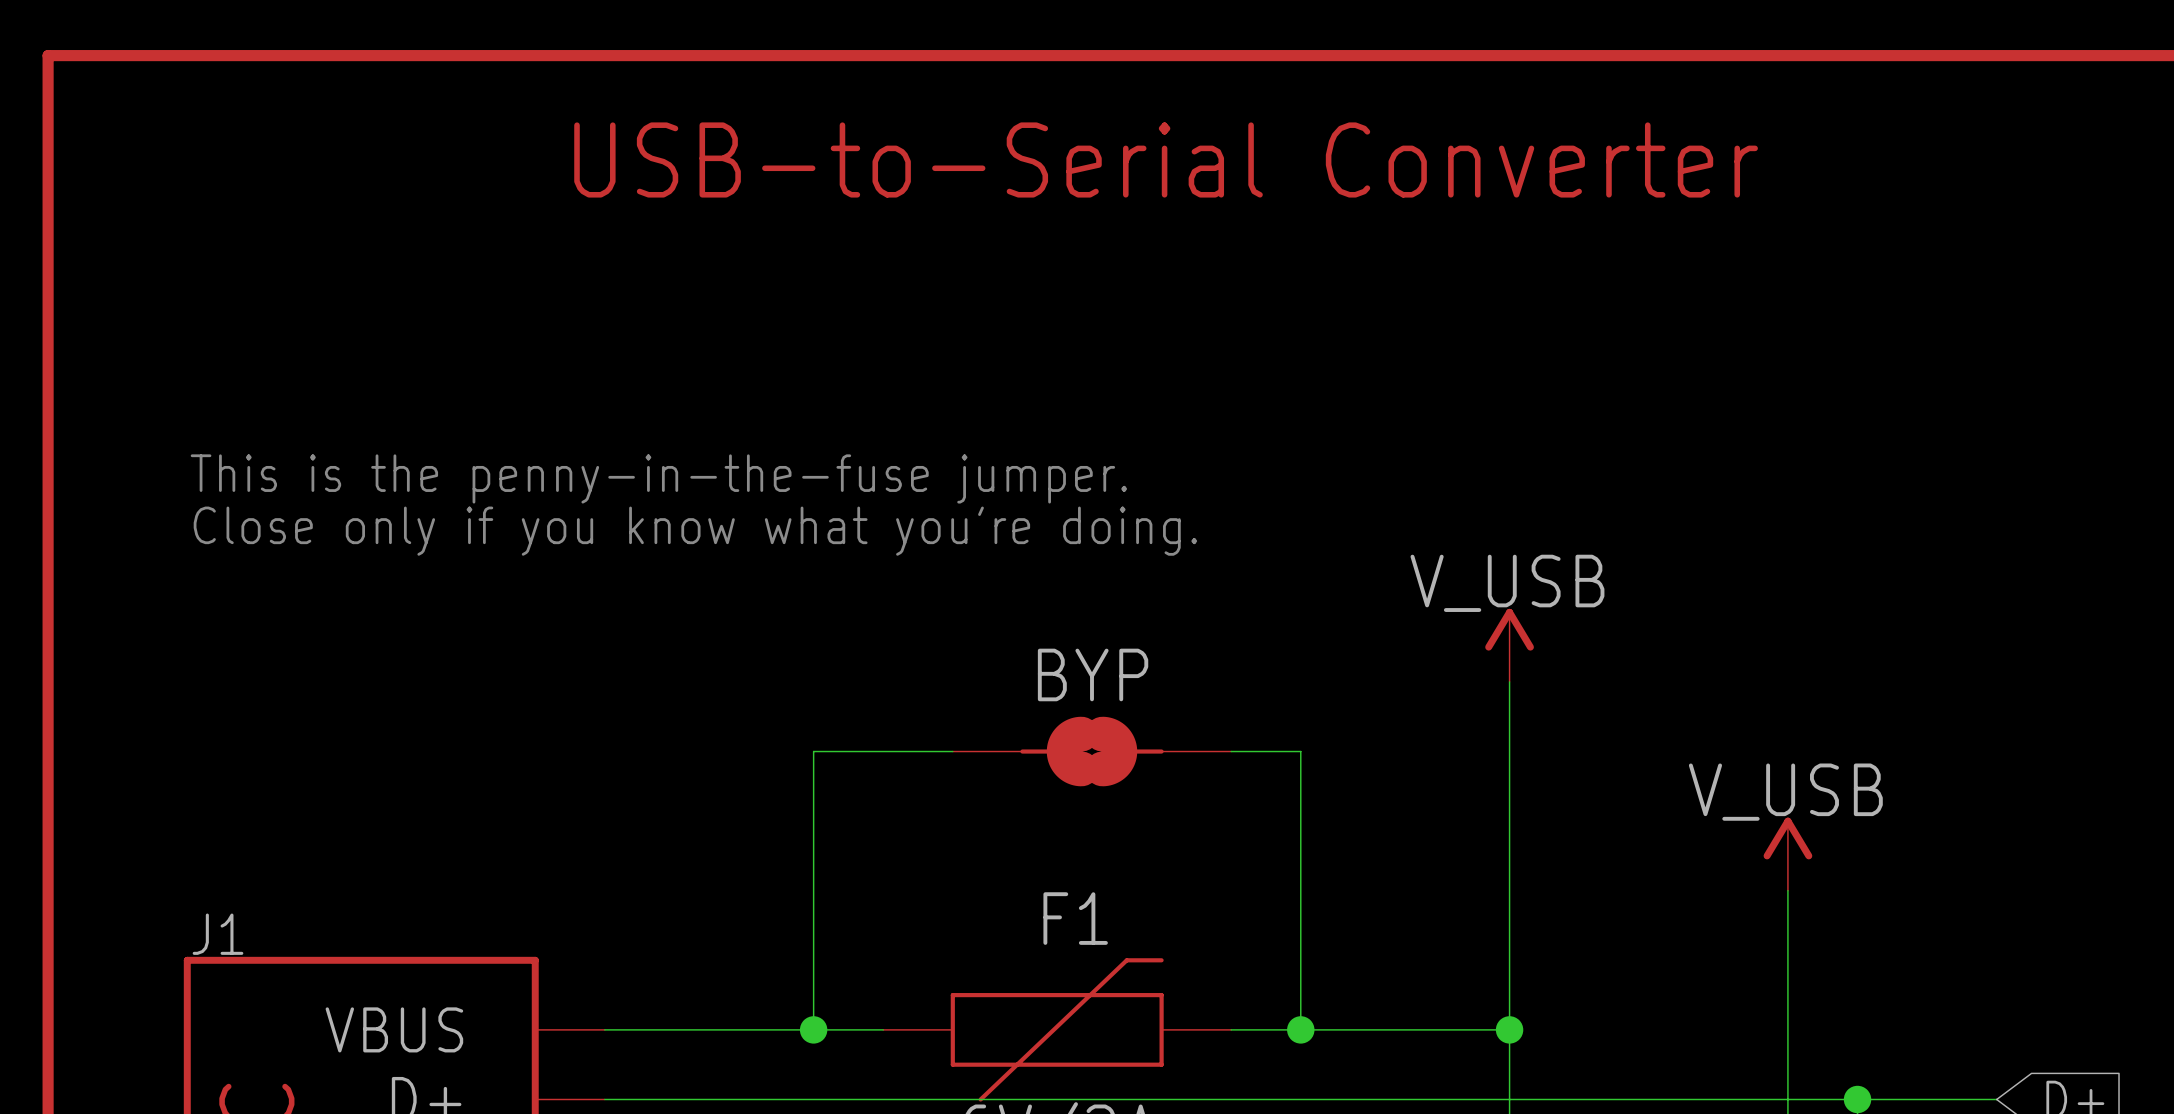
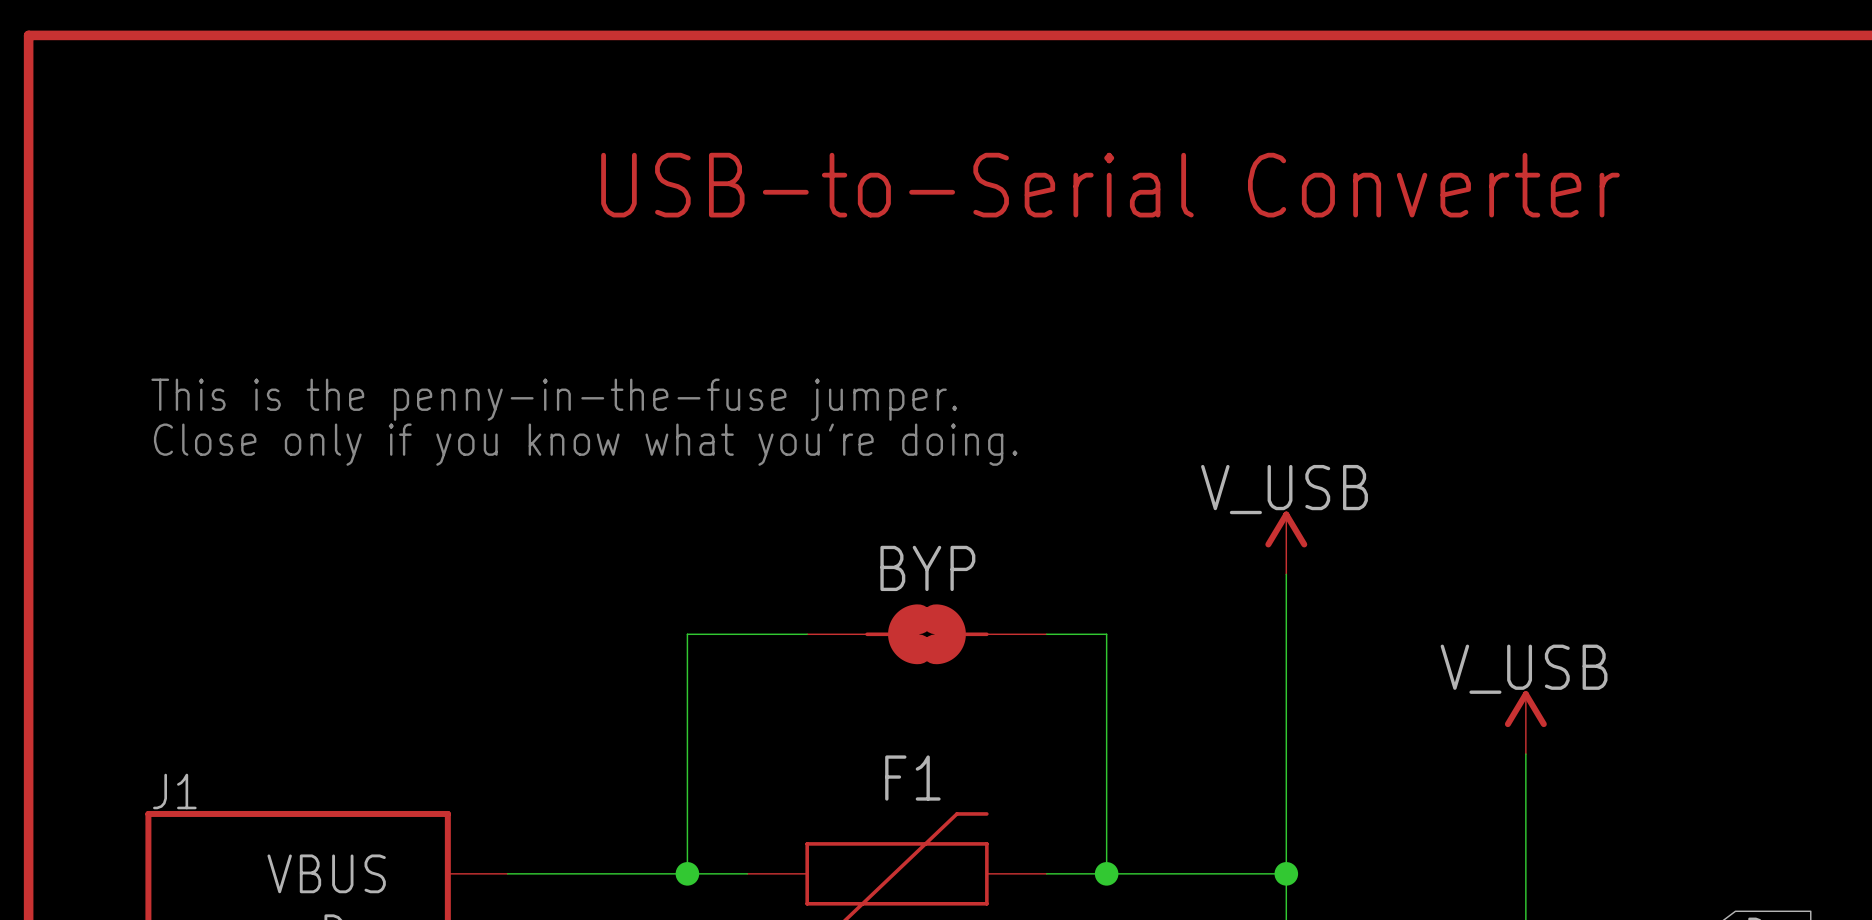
text position: USB-to-Serial Converter (1166, 159) -> USB-to-Serial Converter (1110, 185)

